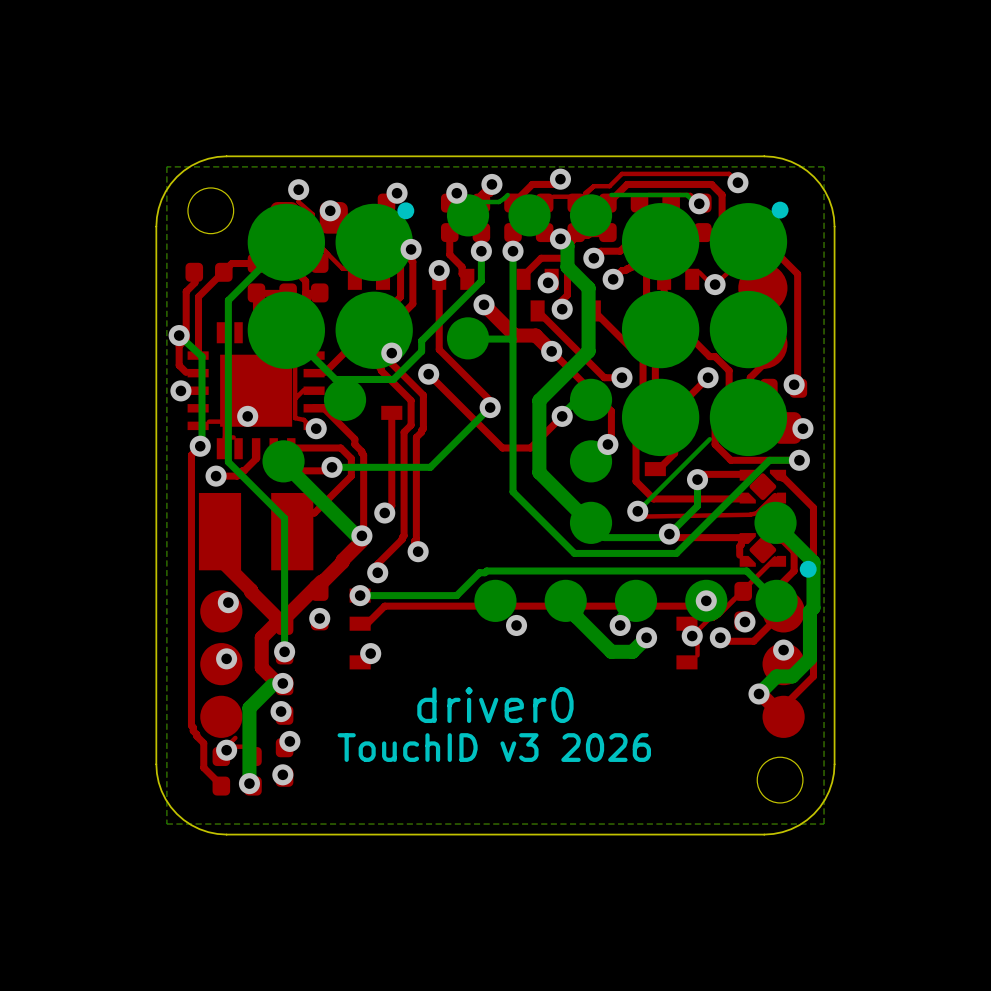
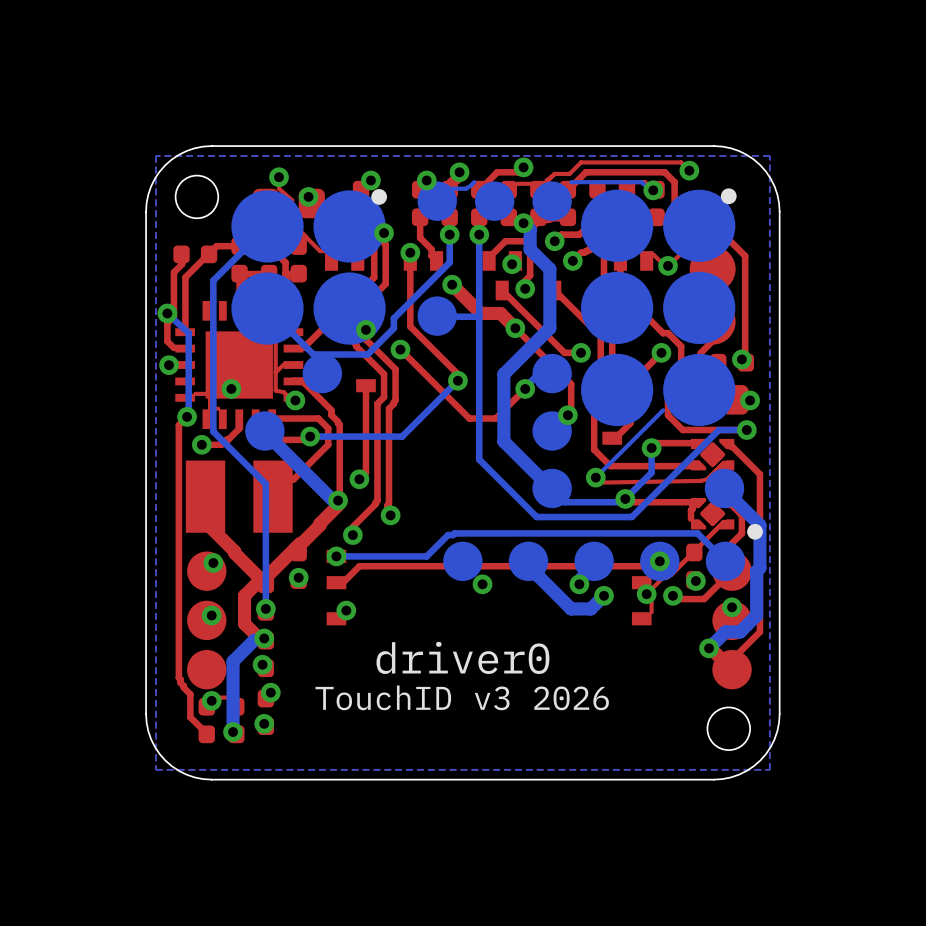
top track: (235, 737) (230, 743) -> none

